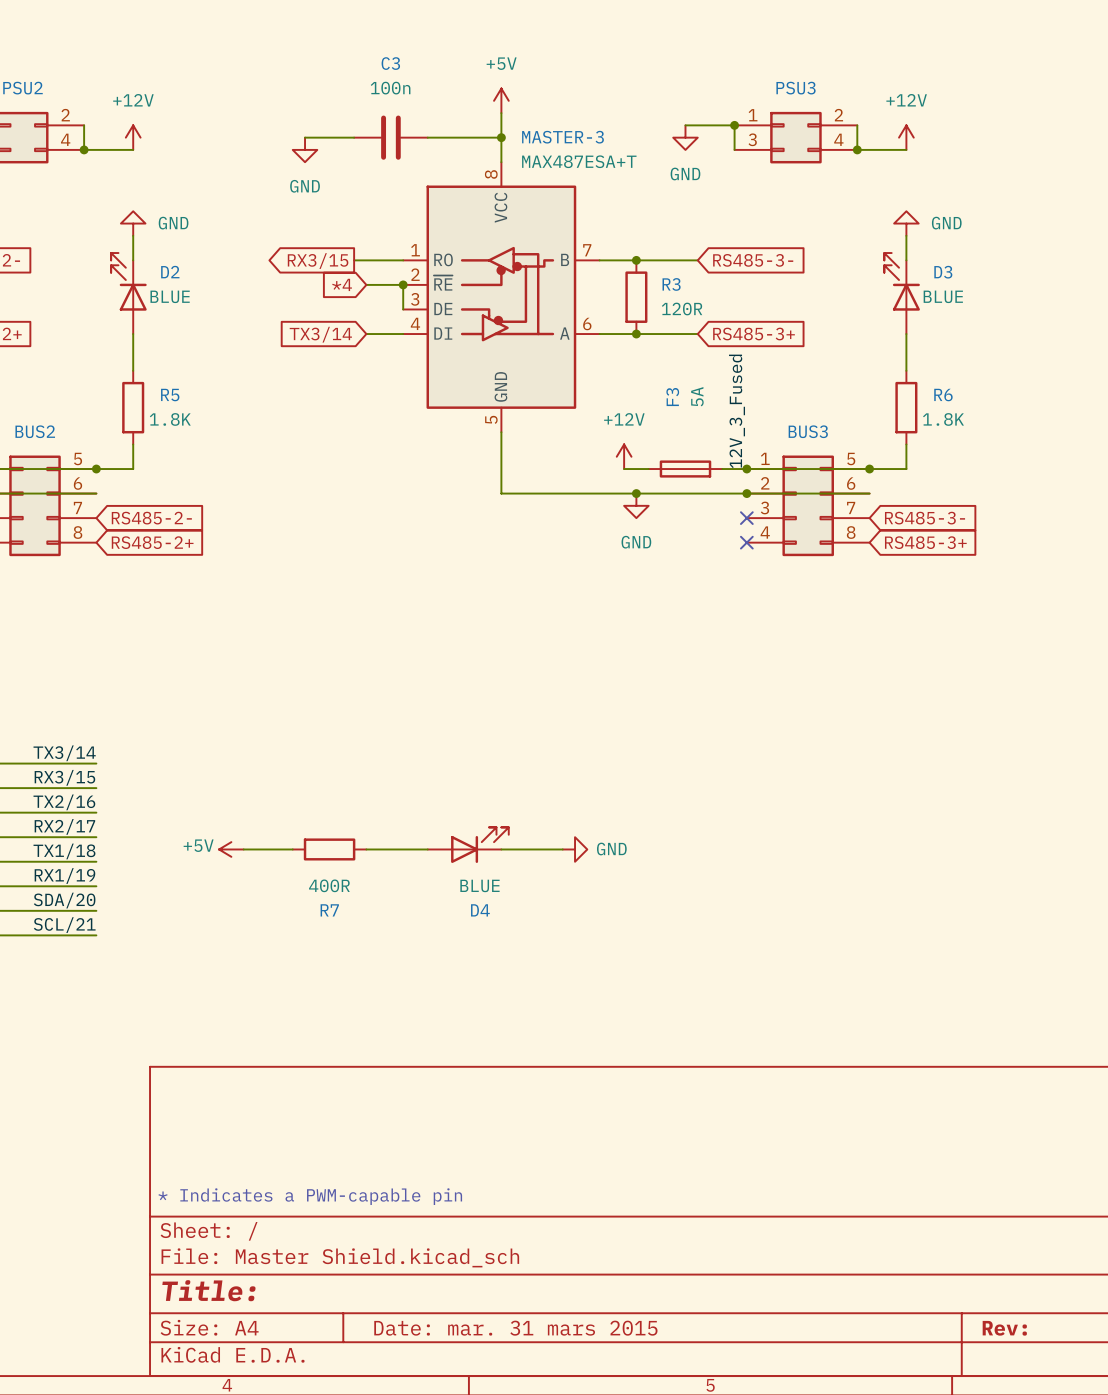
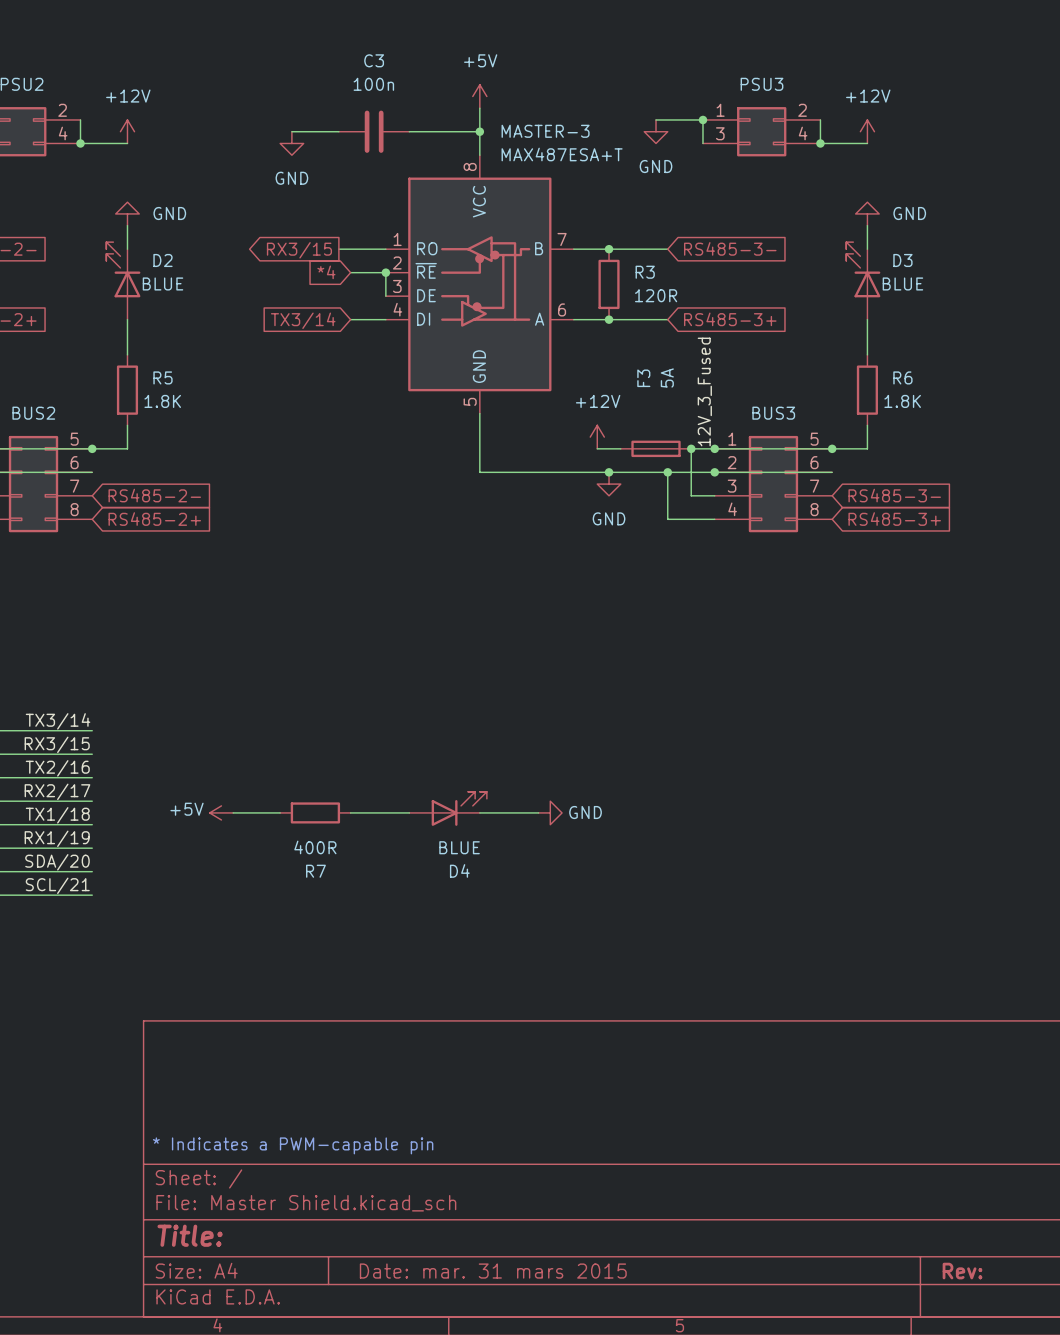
wire: none -> (691, 448) (691, 495) (714, 495)
junction: none -> (691, 448)
wire: none -> (667, 472) (667, 519) (714, 519)
junction: none -> (667, 472)
no-connect mark: (746, 518) -> none
no-connect mark: (746, 542) -> none

